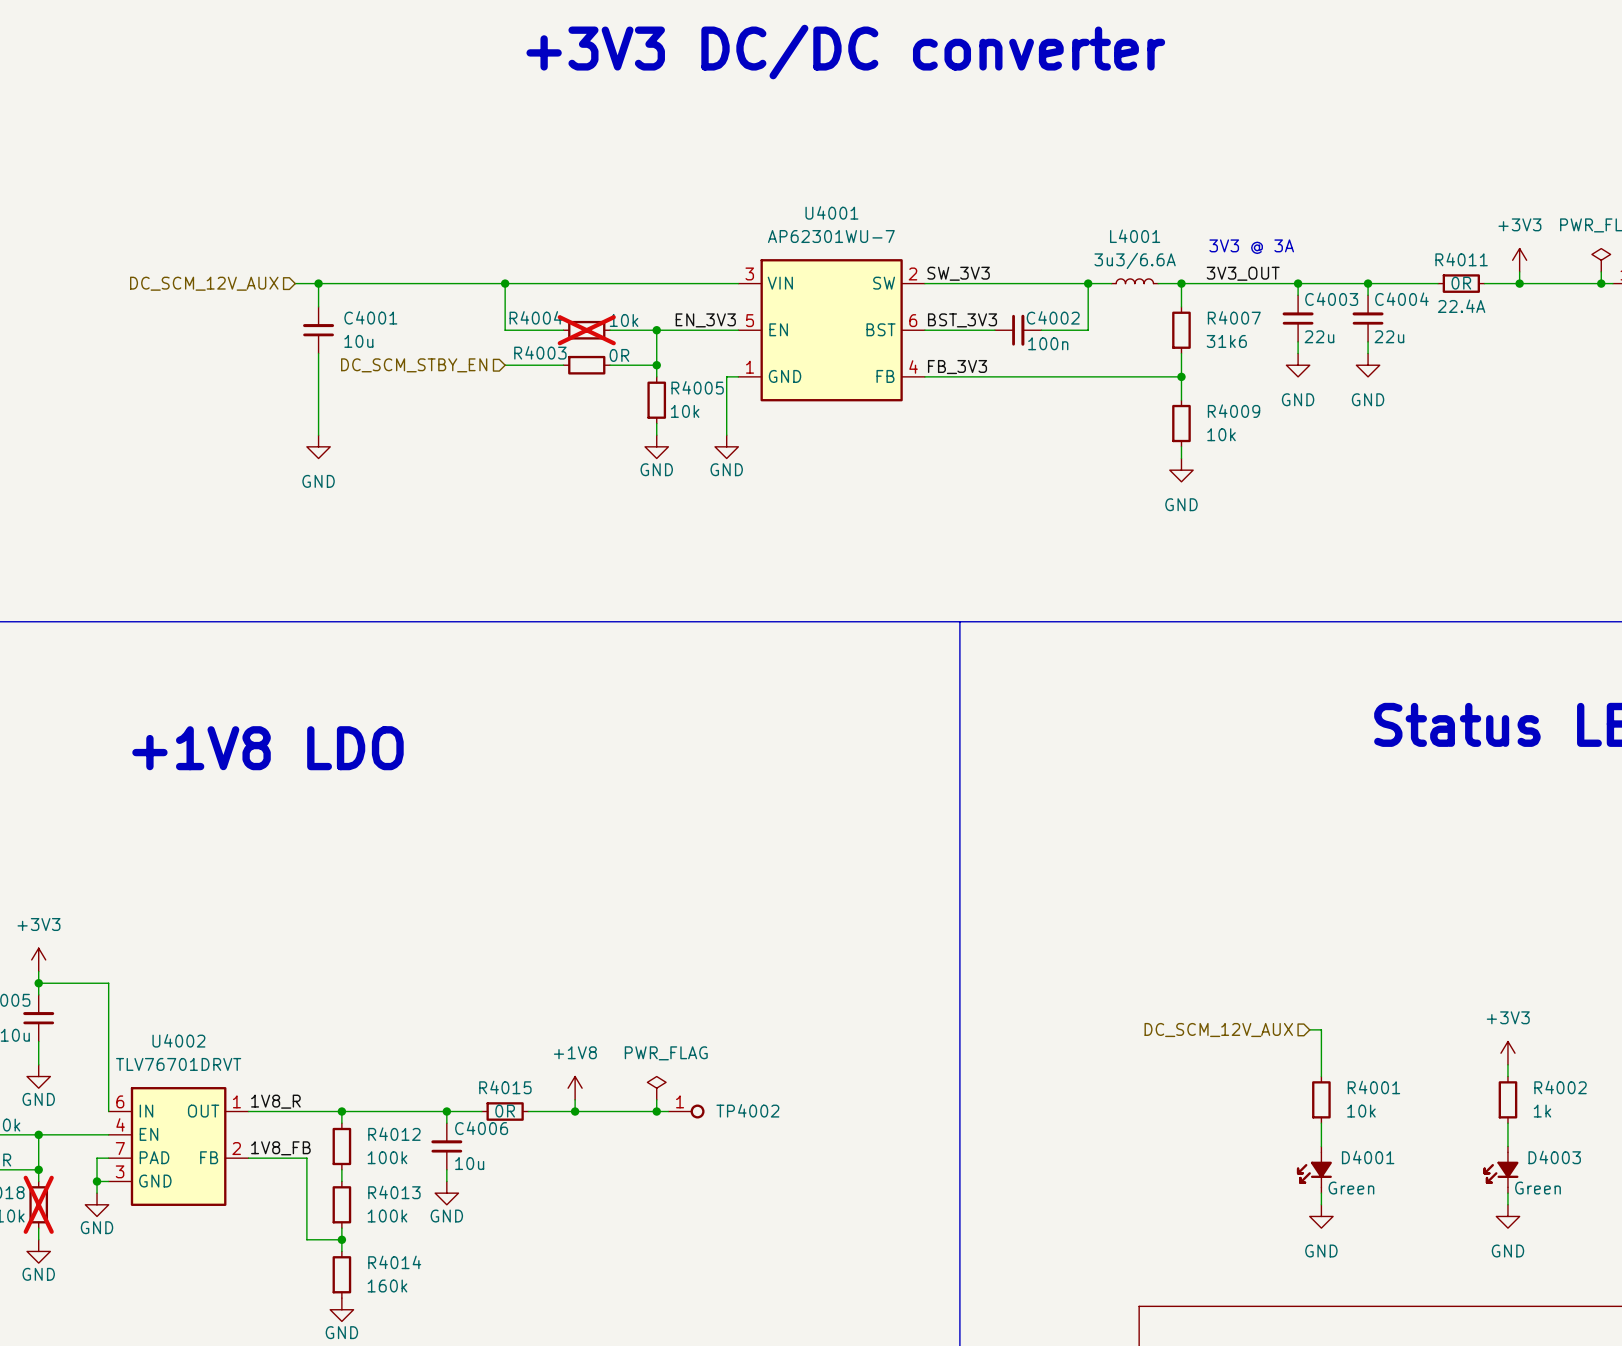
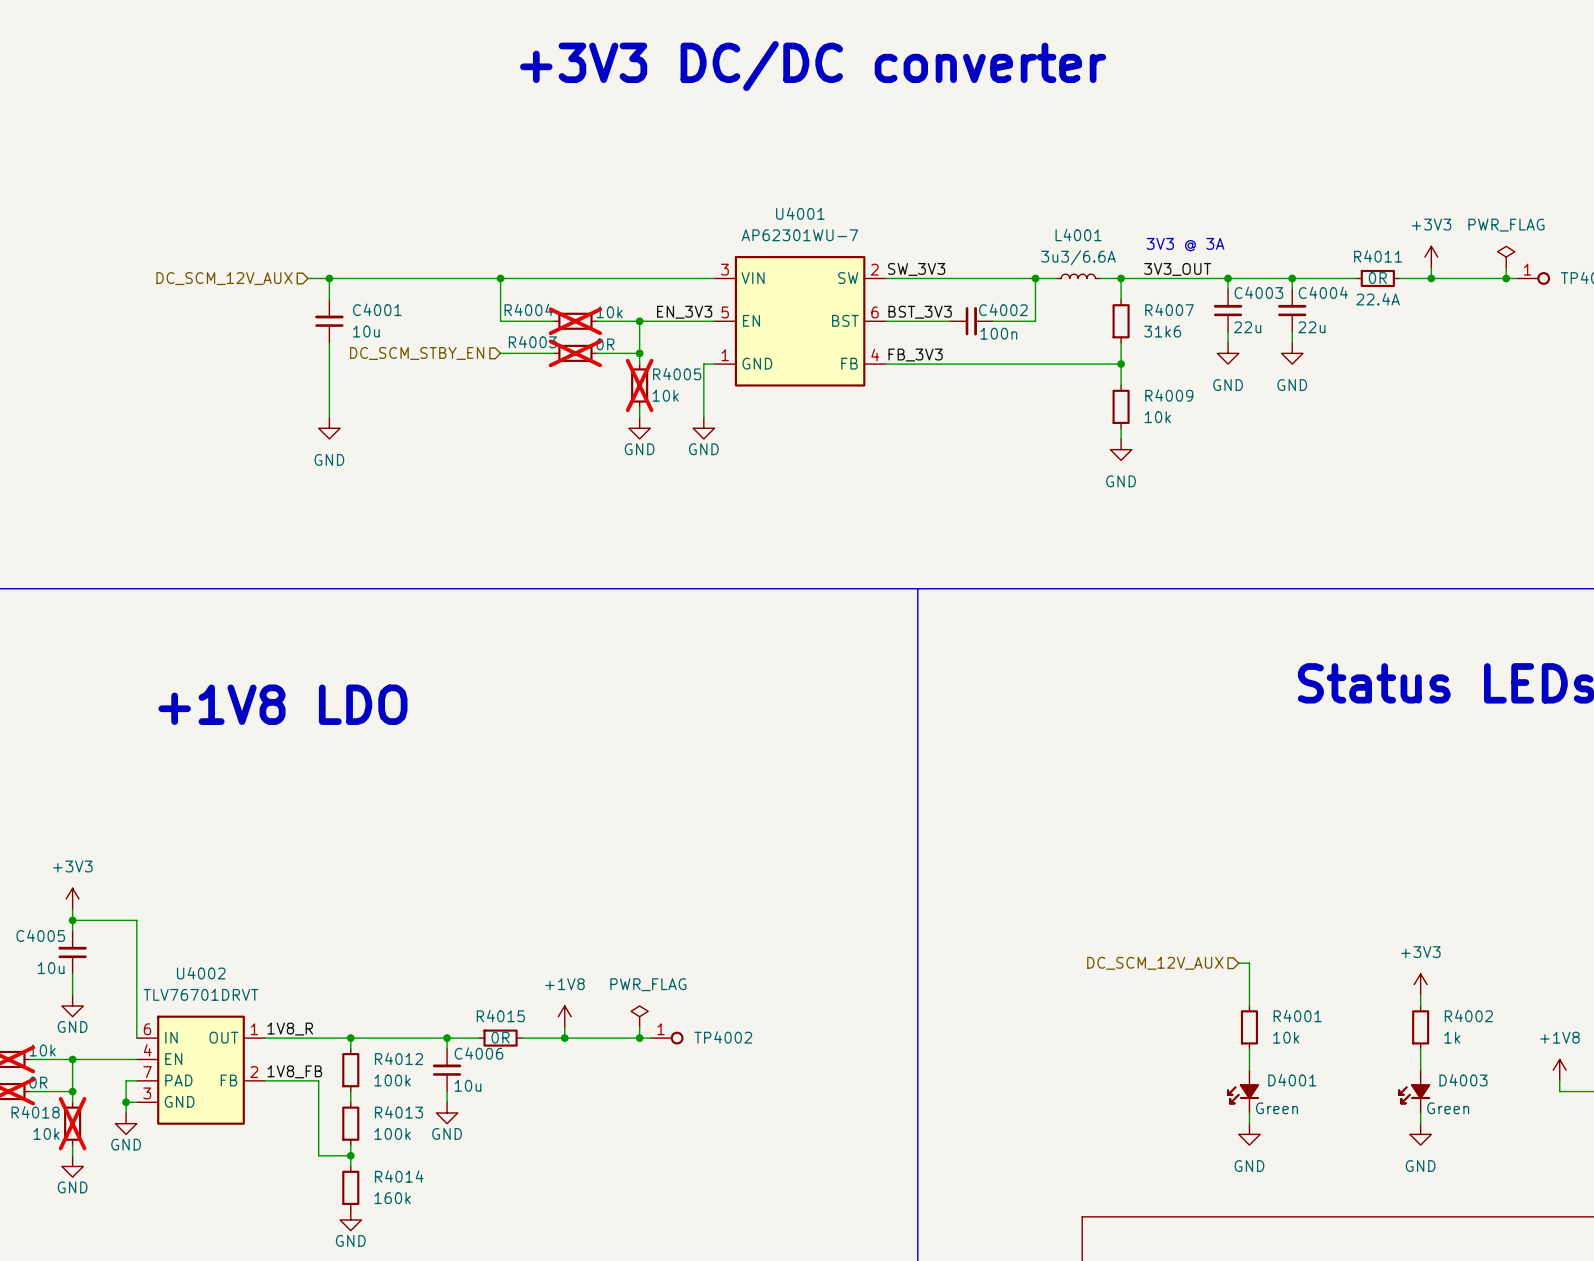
R4003 do-not-place cross: none -> (575, 353)
R4005 do-not-place cross: none -> (639, 385)

